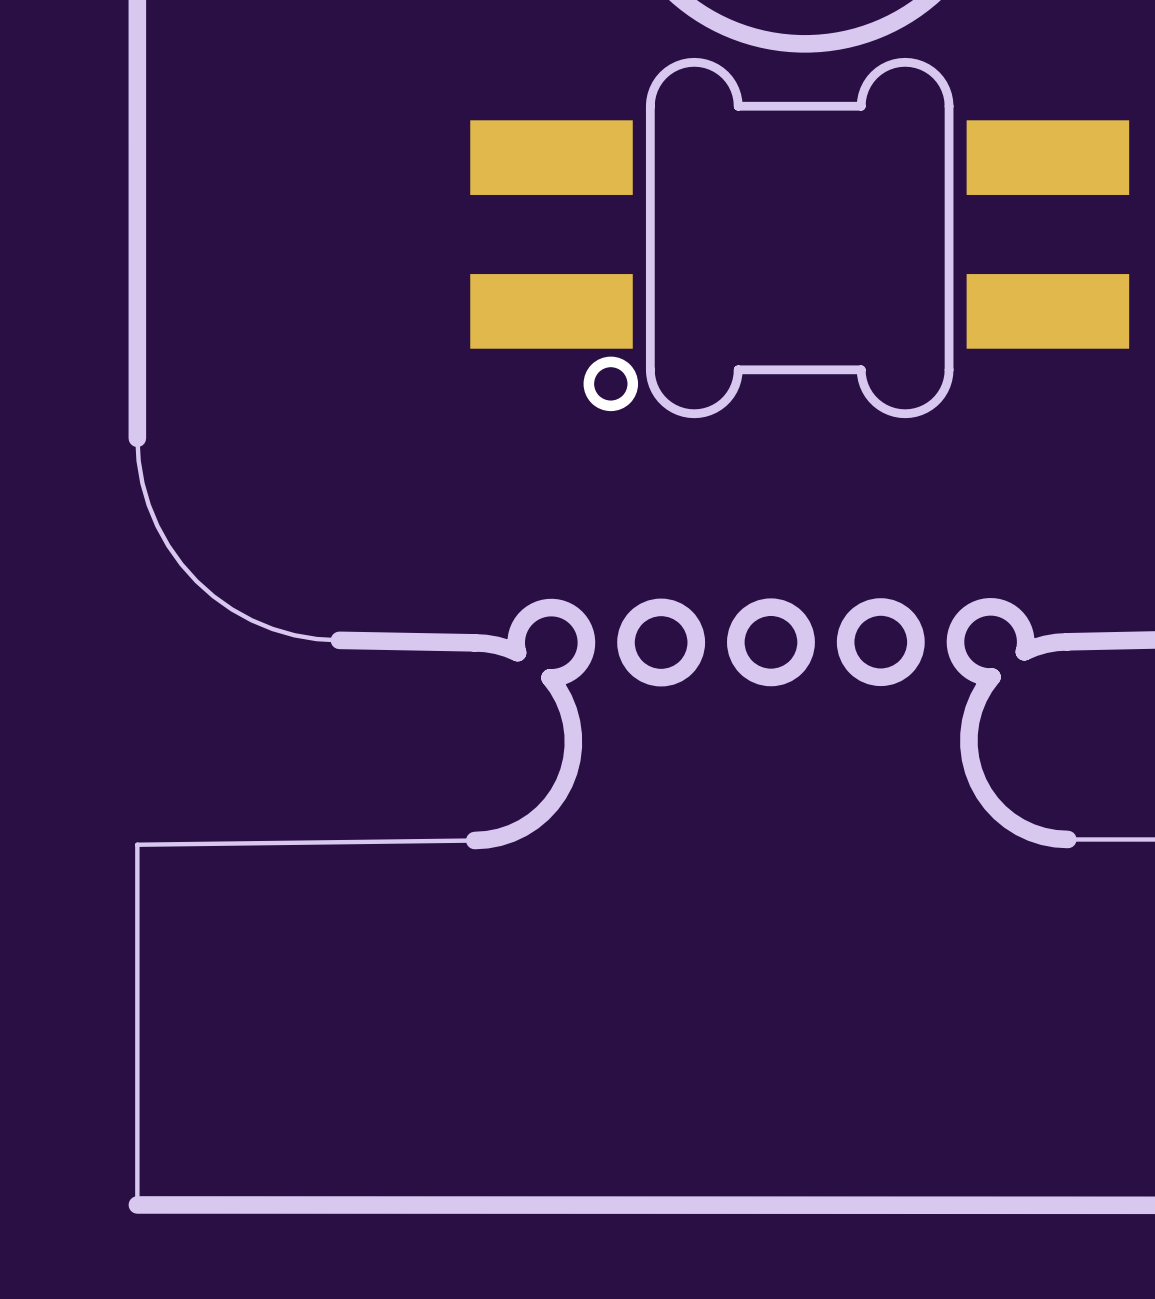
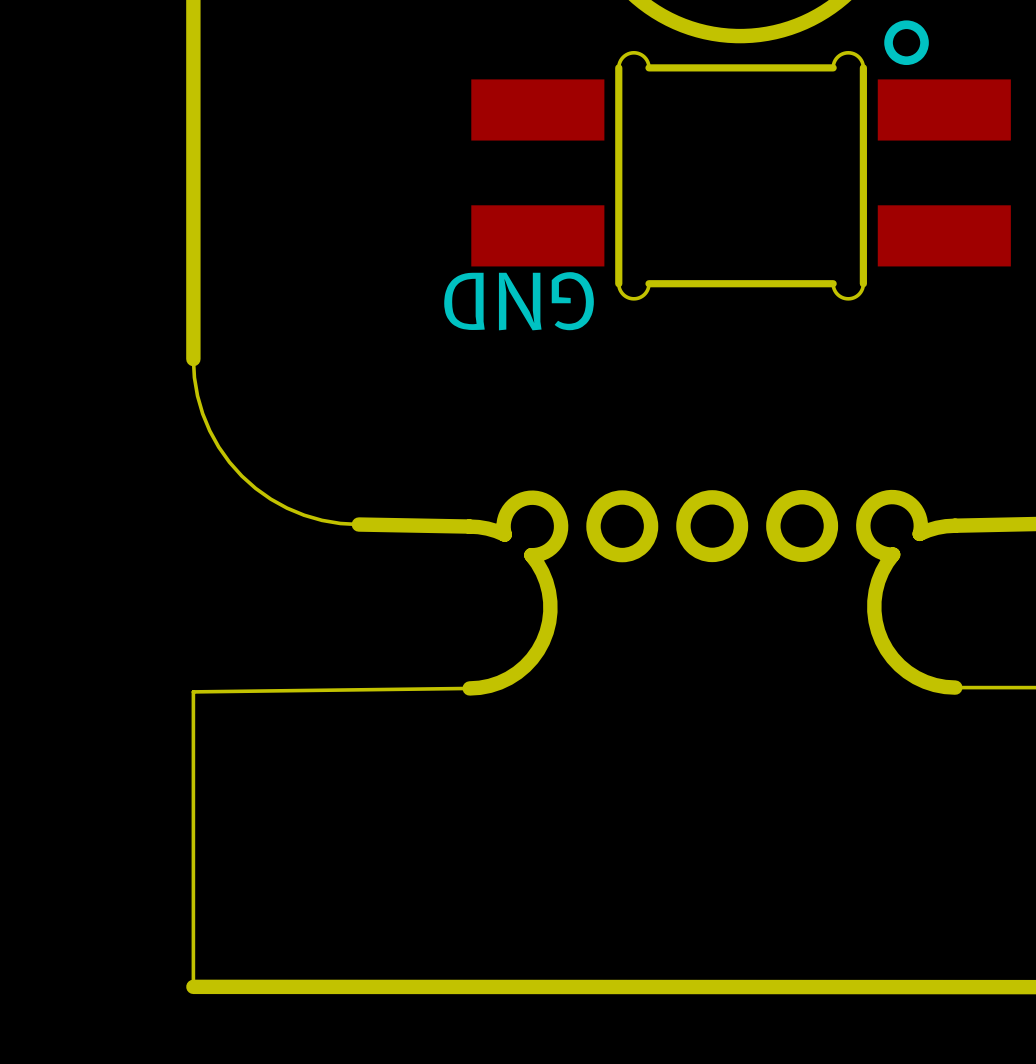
part footprint: [470, 57, 1130, 419] -> [471, 20, 1011, 301]

